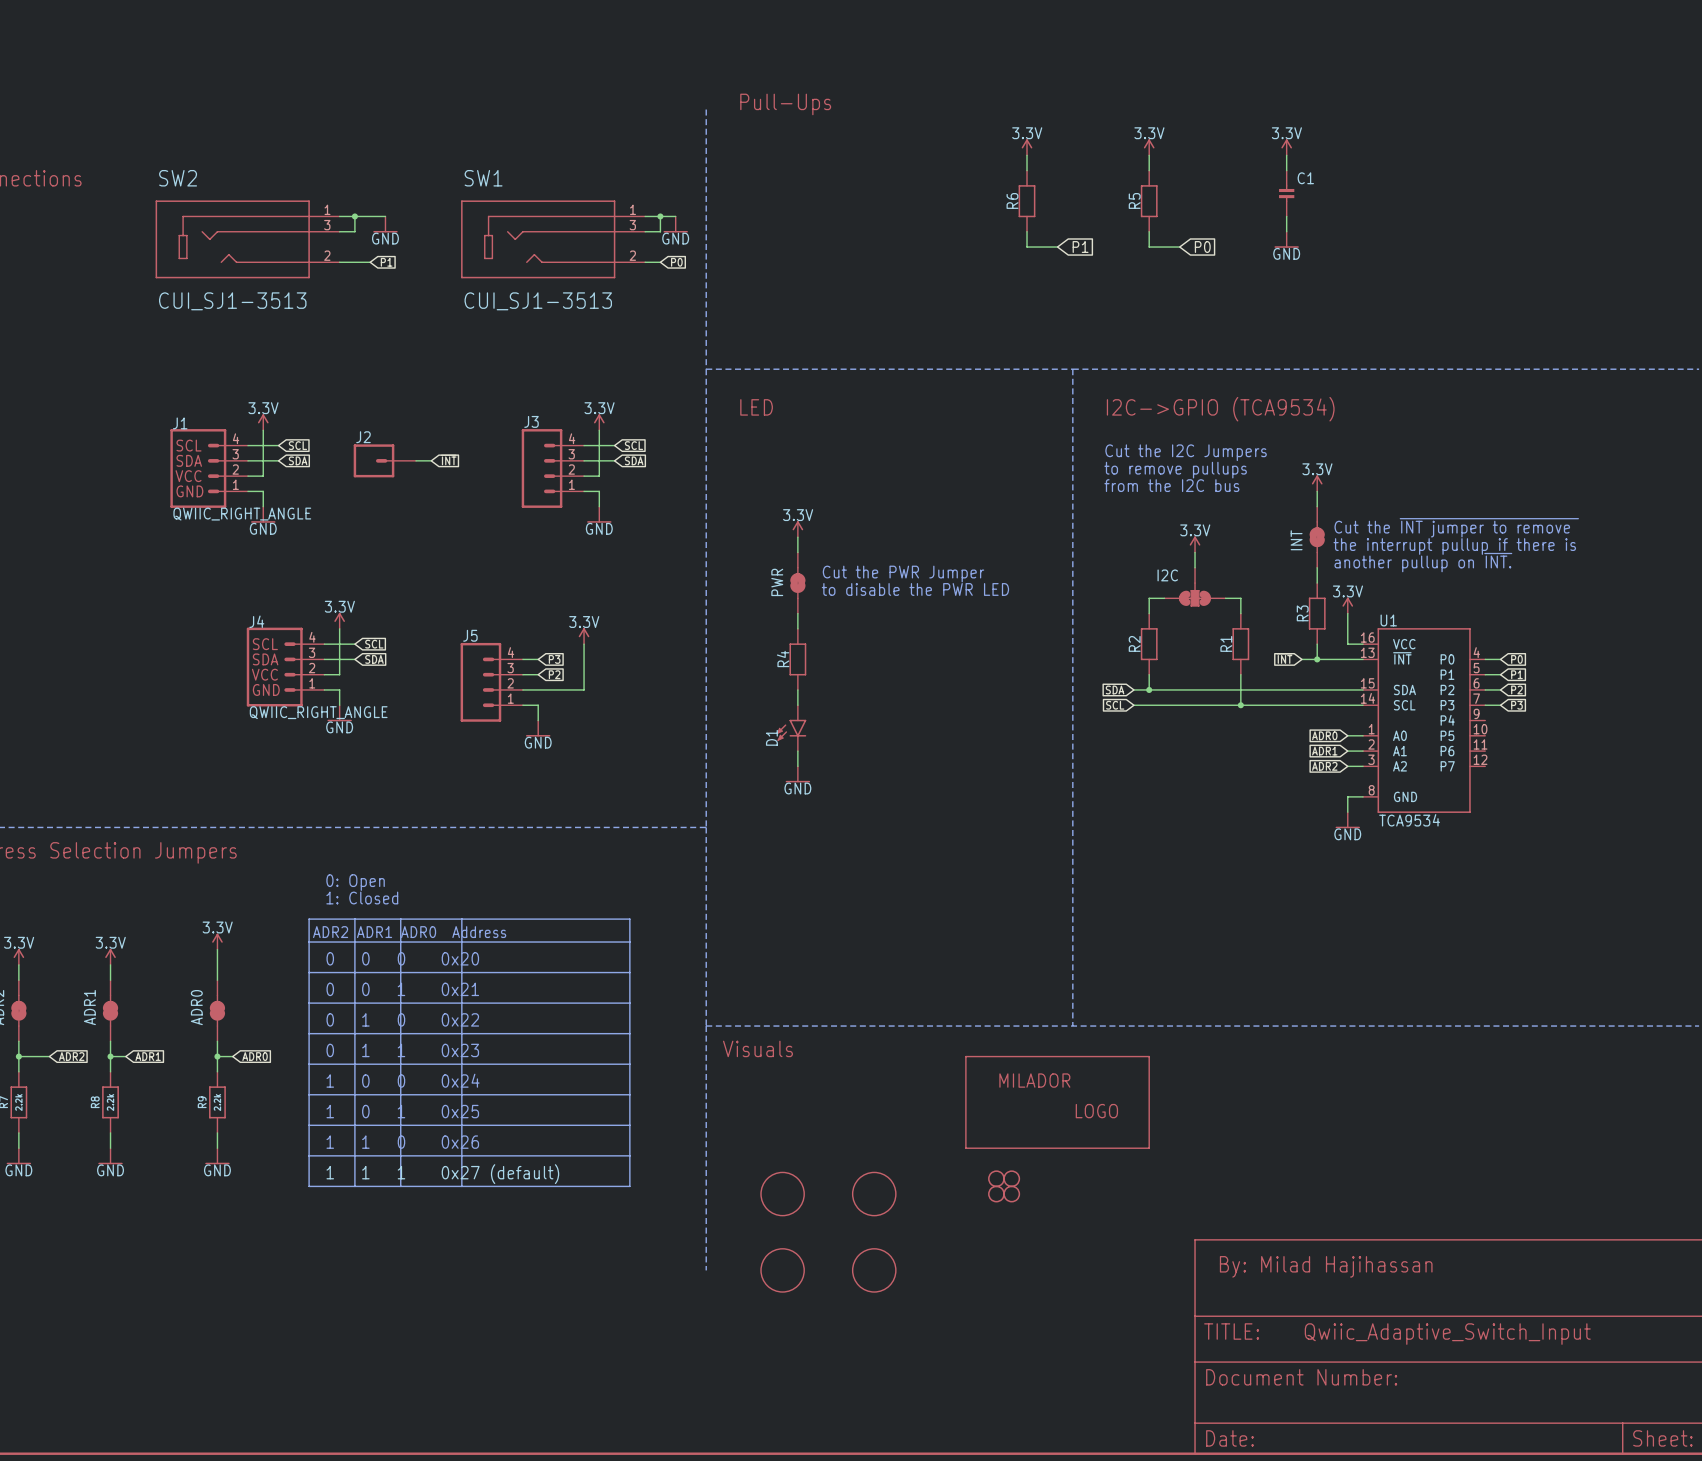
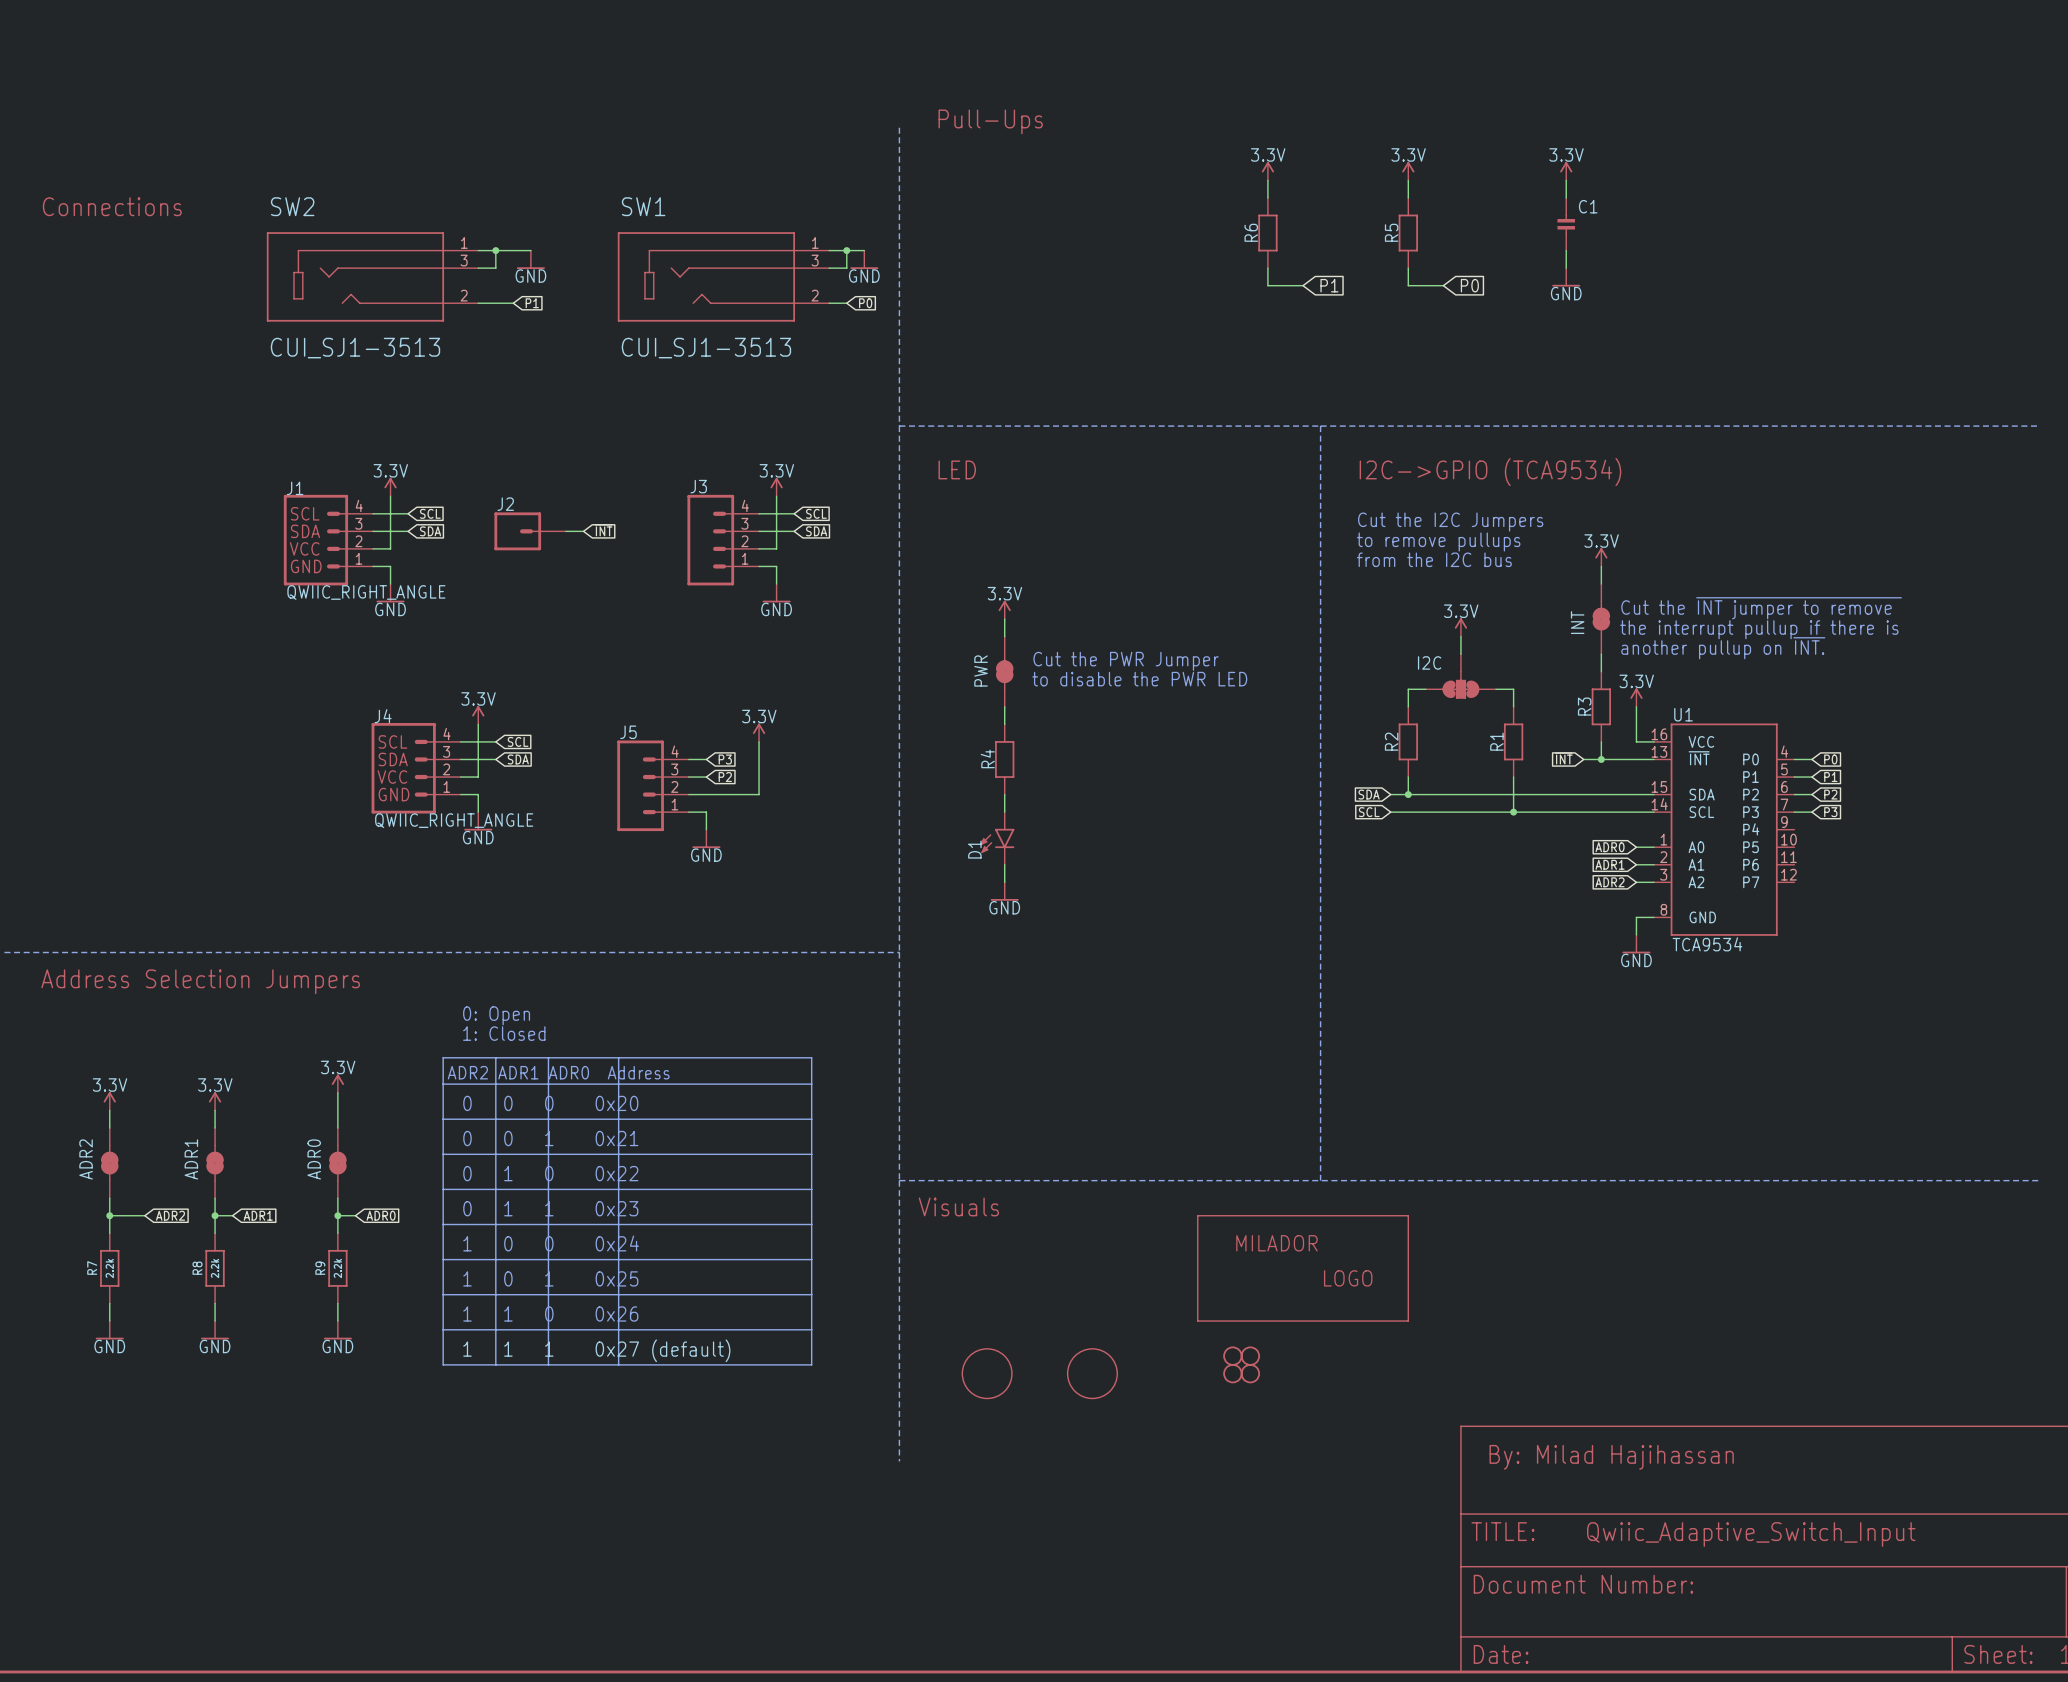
part: (782, 1270) -> none
part: (874, 1270) -> none

